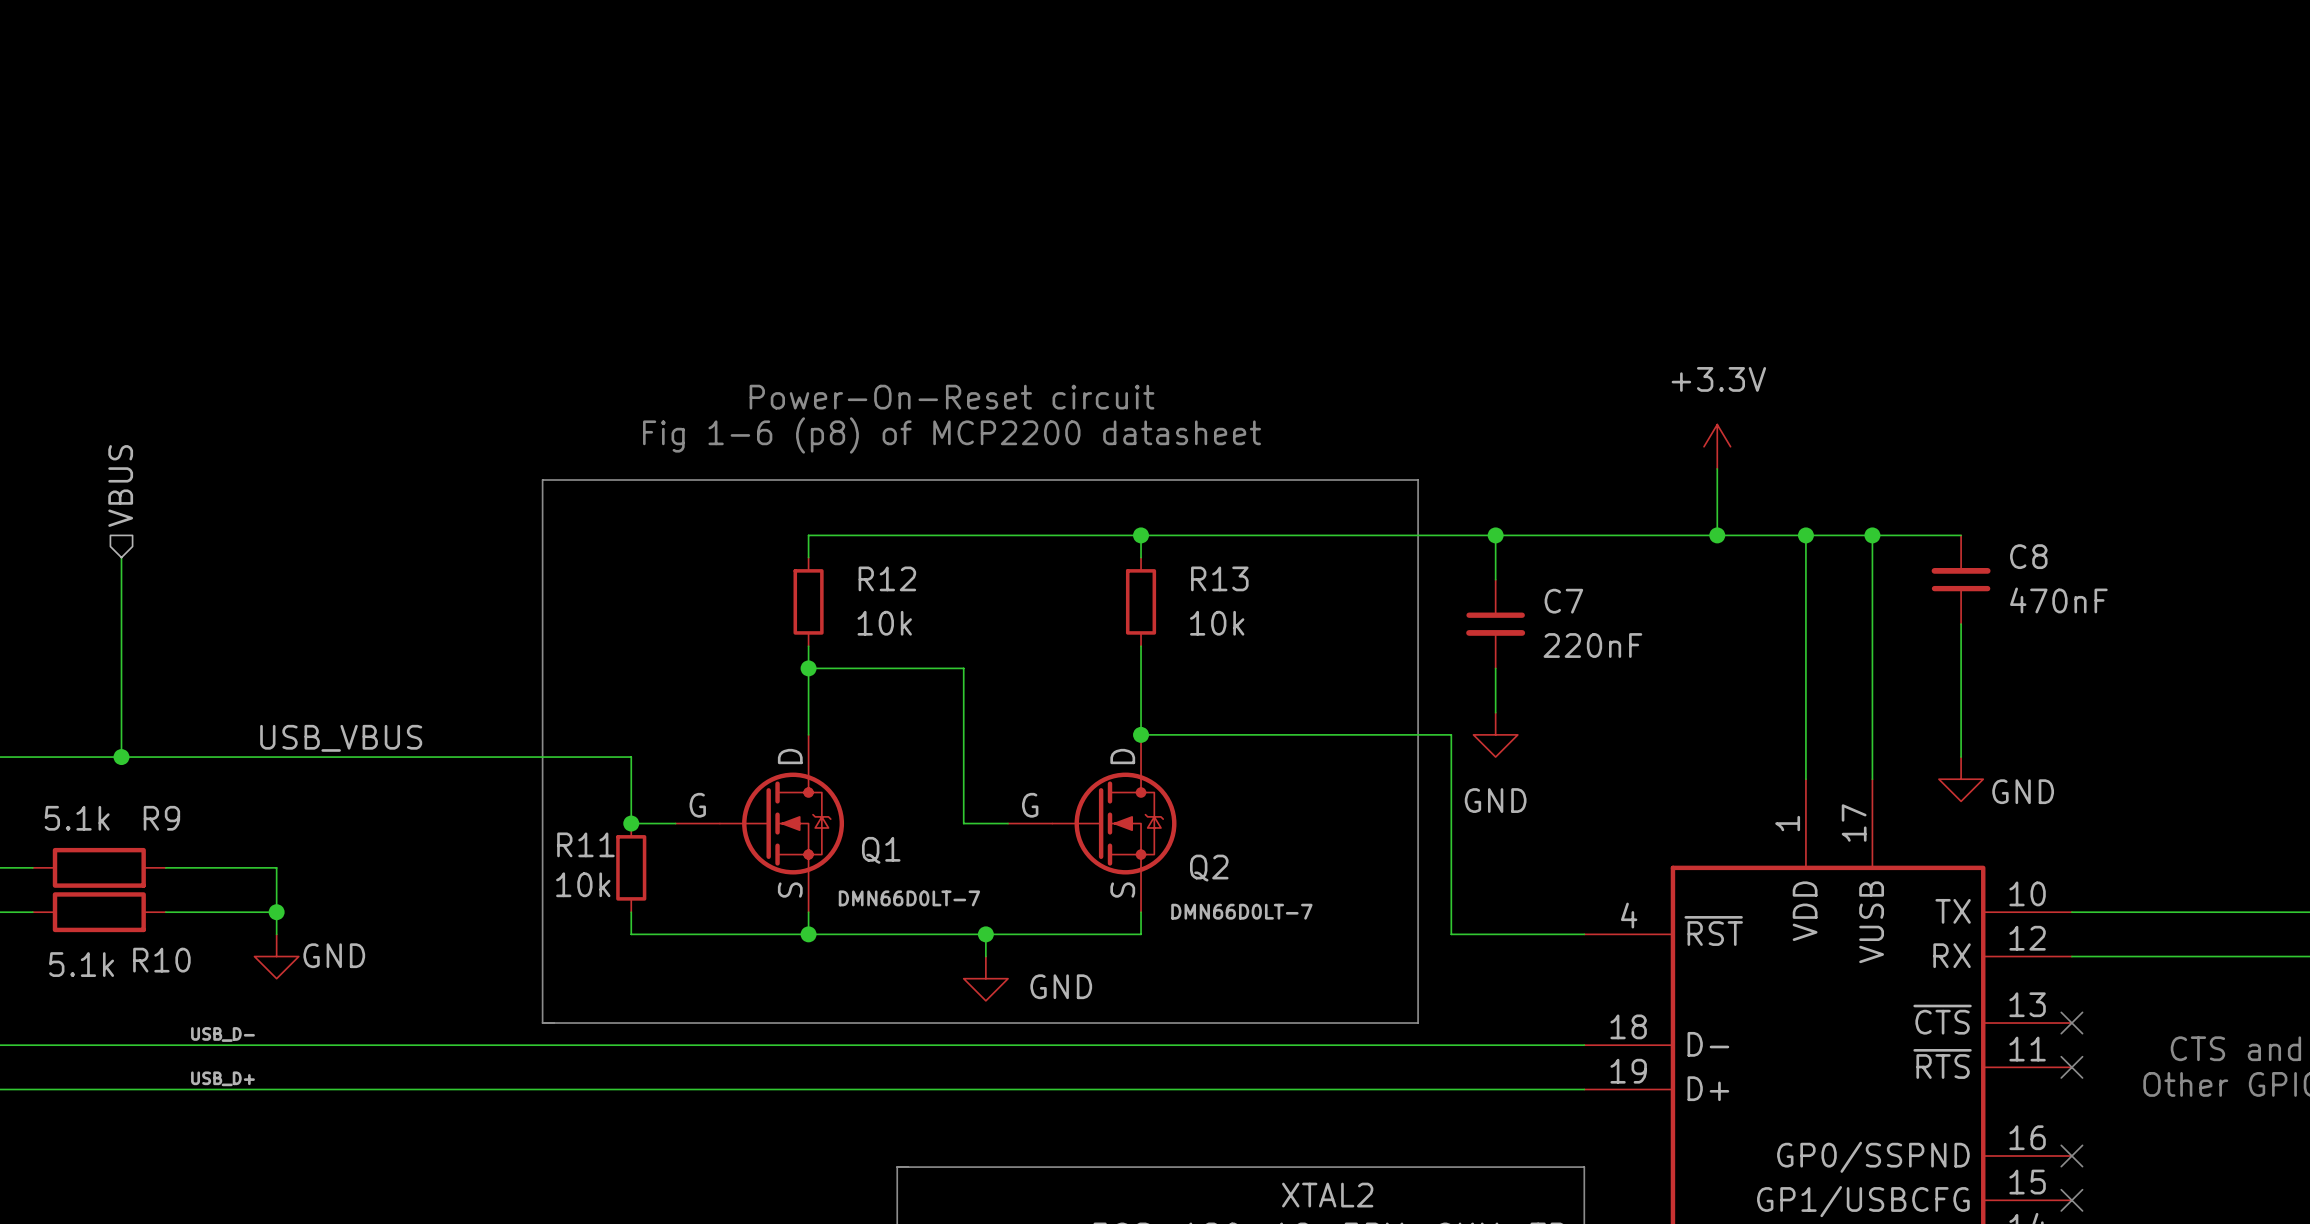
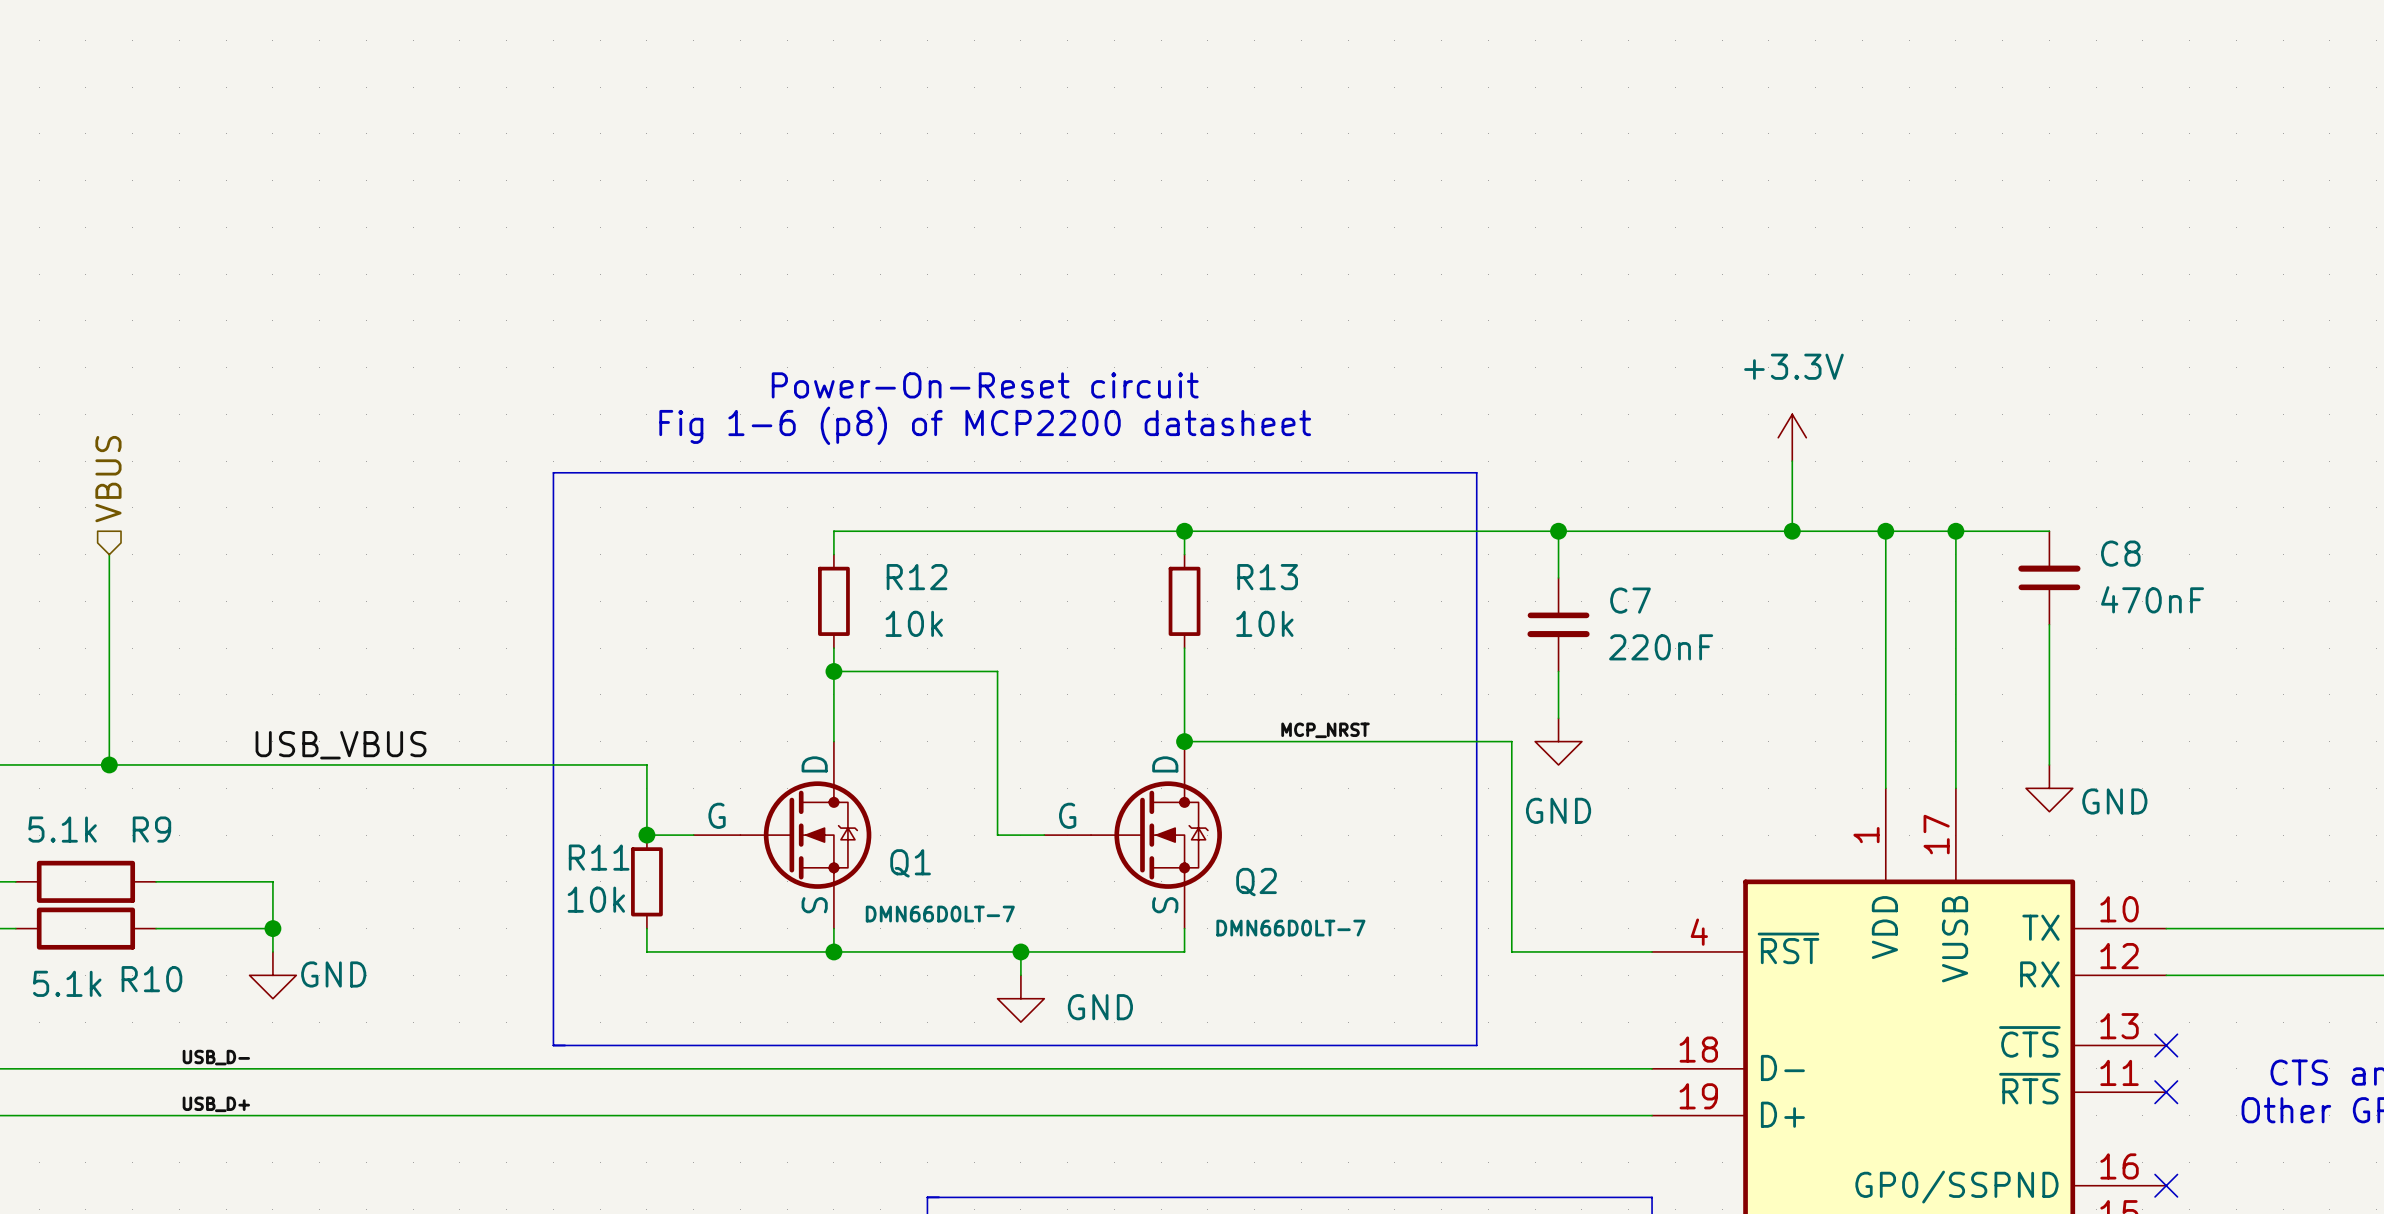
label: none -> MCP_NRST (1325, 730)

